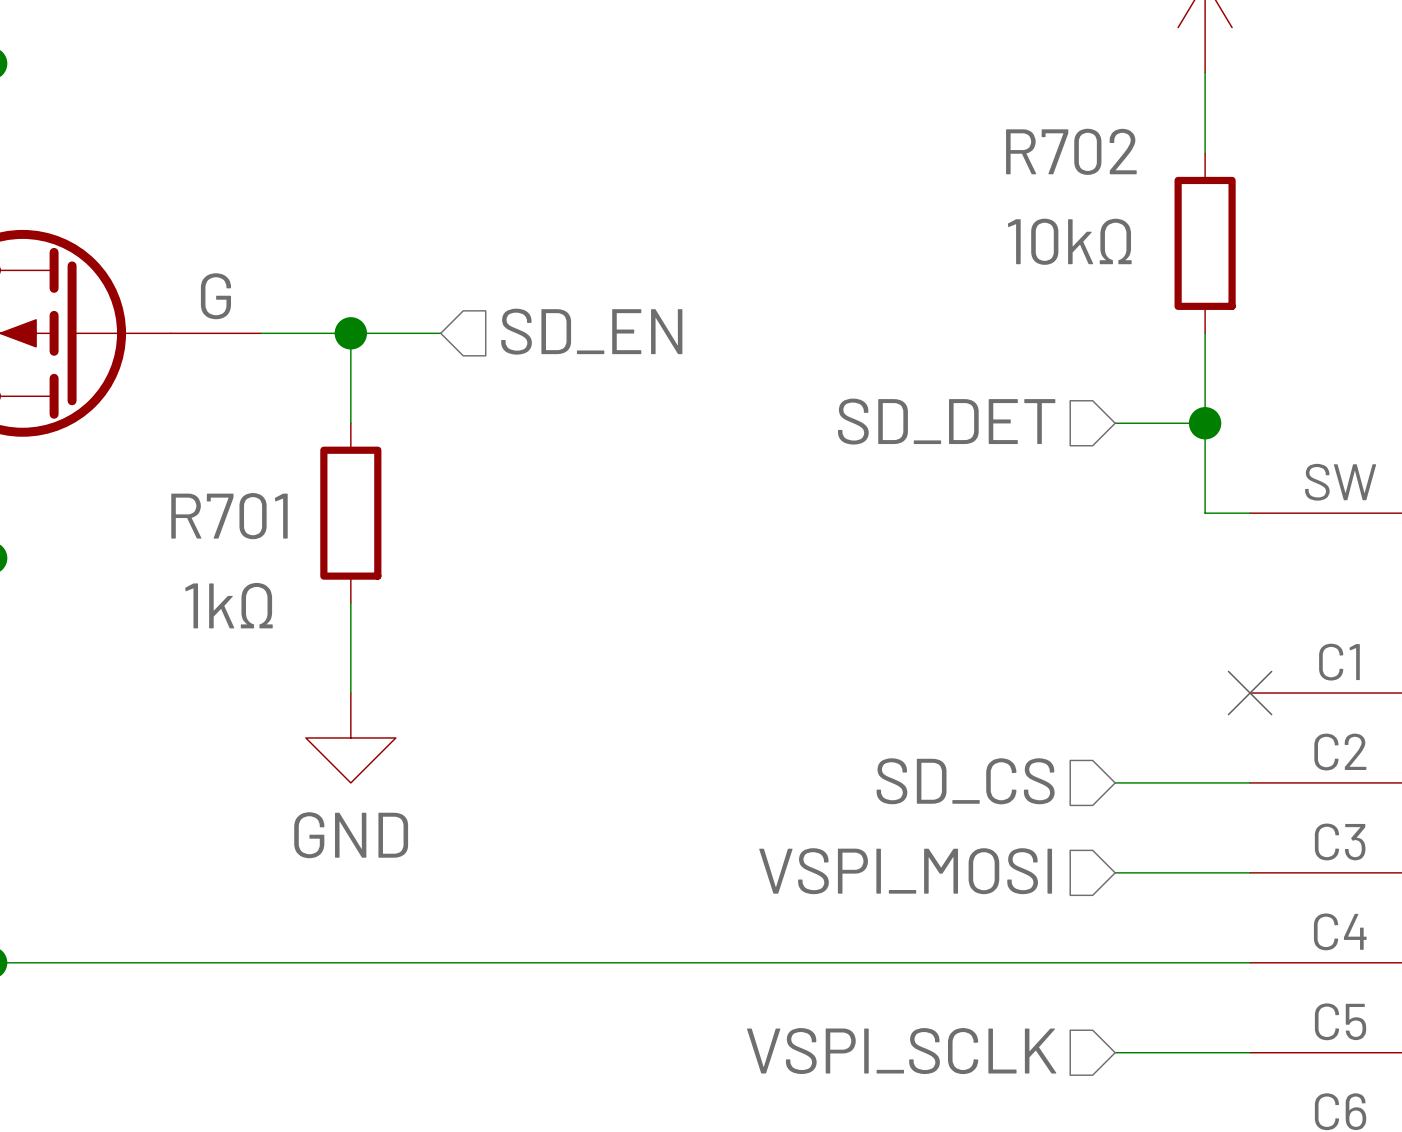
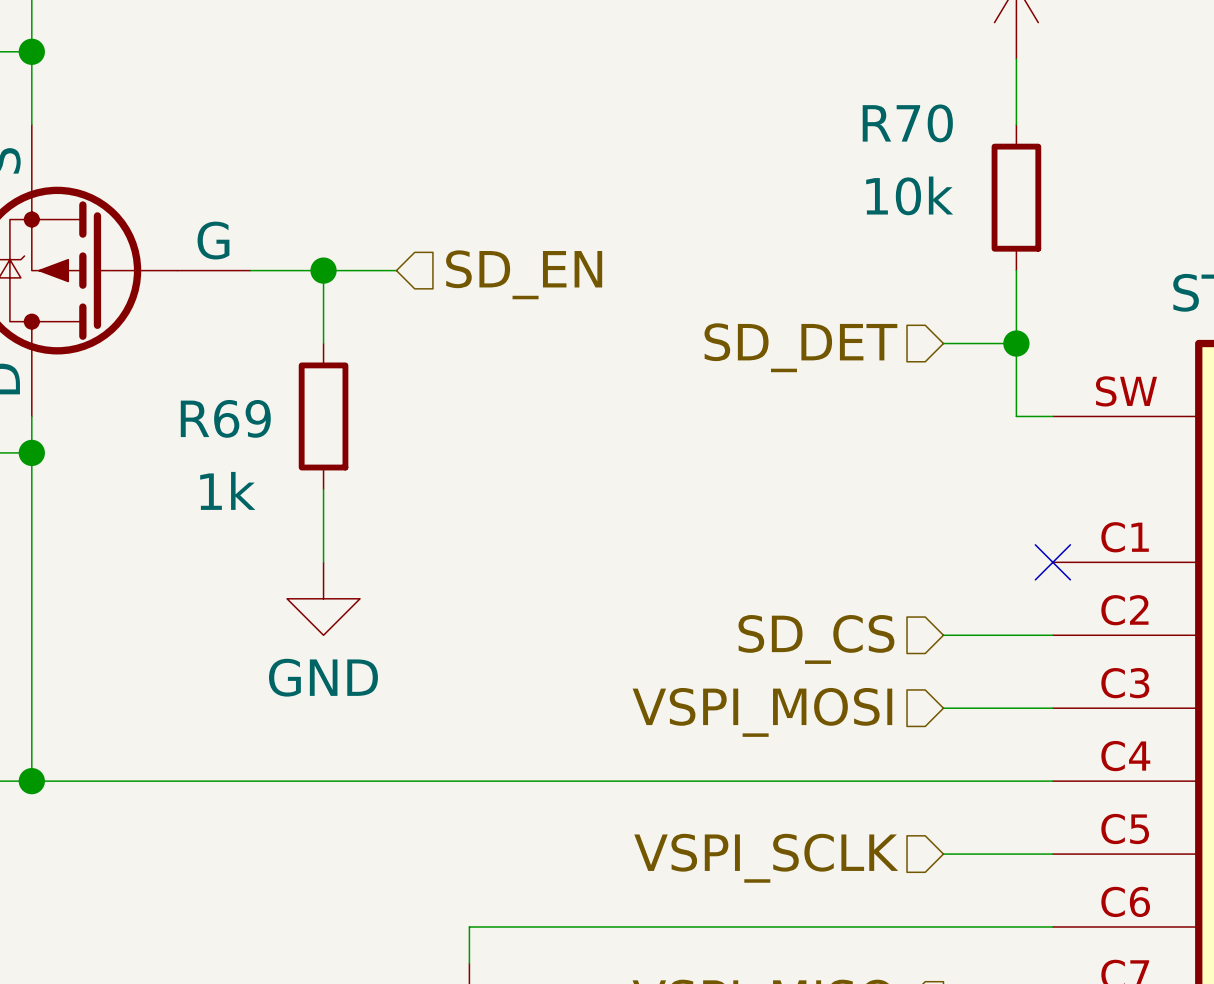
R702 name: R702 (1071, 151) -> R70 (907, 123)
R702 value: 10kΩ (1069, 241) -> 10k (909, 195)
R701 name: R701 (229, 516) -> R69 (225, 418)
R701 value: 1kΩ (228, 605) -> 1k (227, 490)

